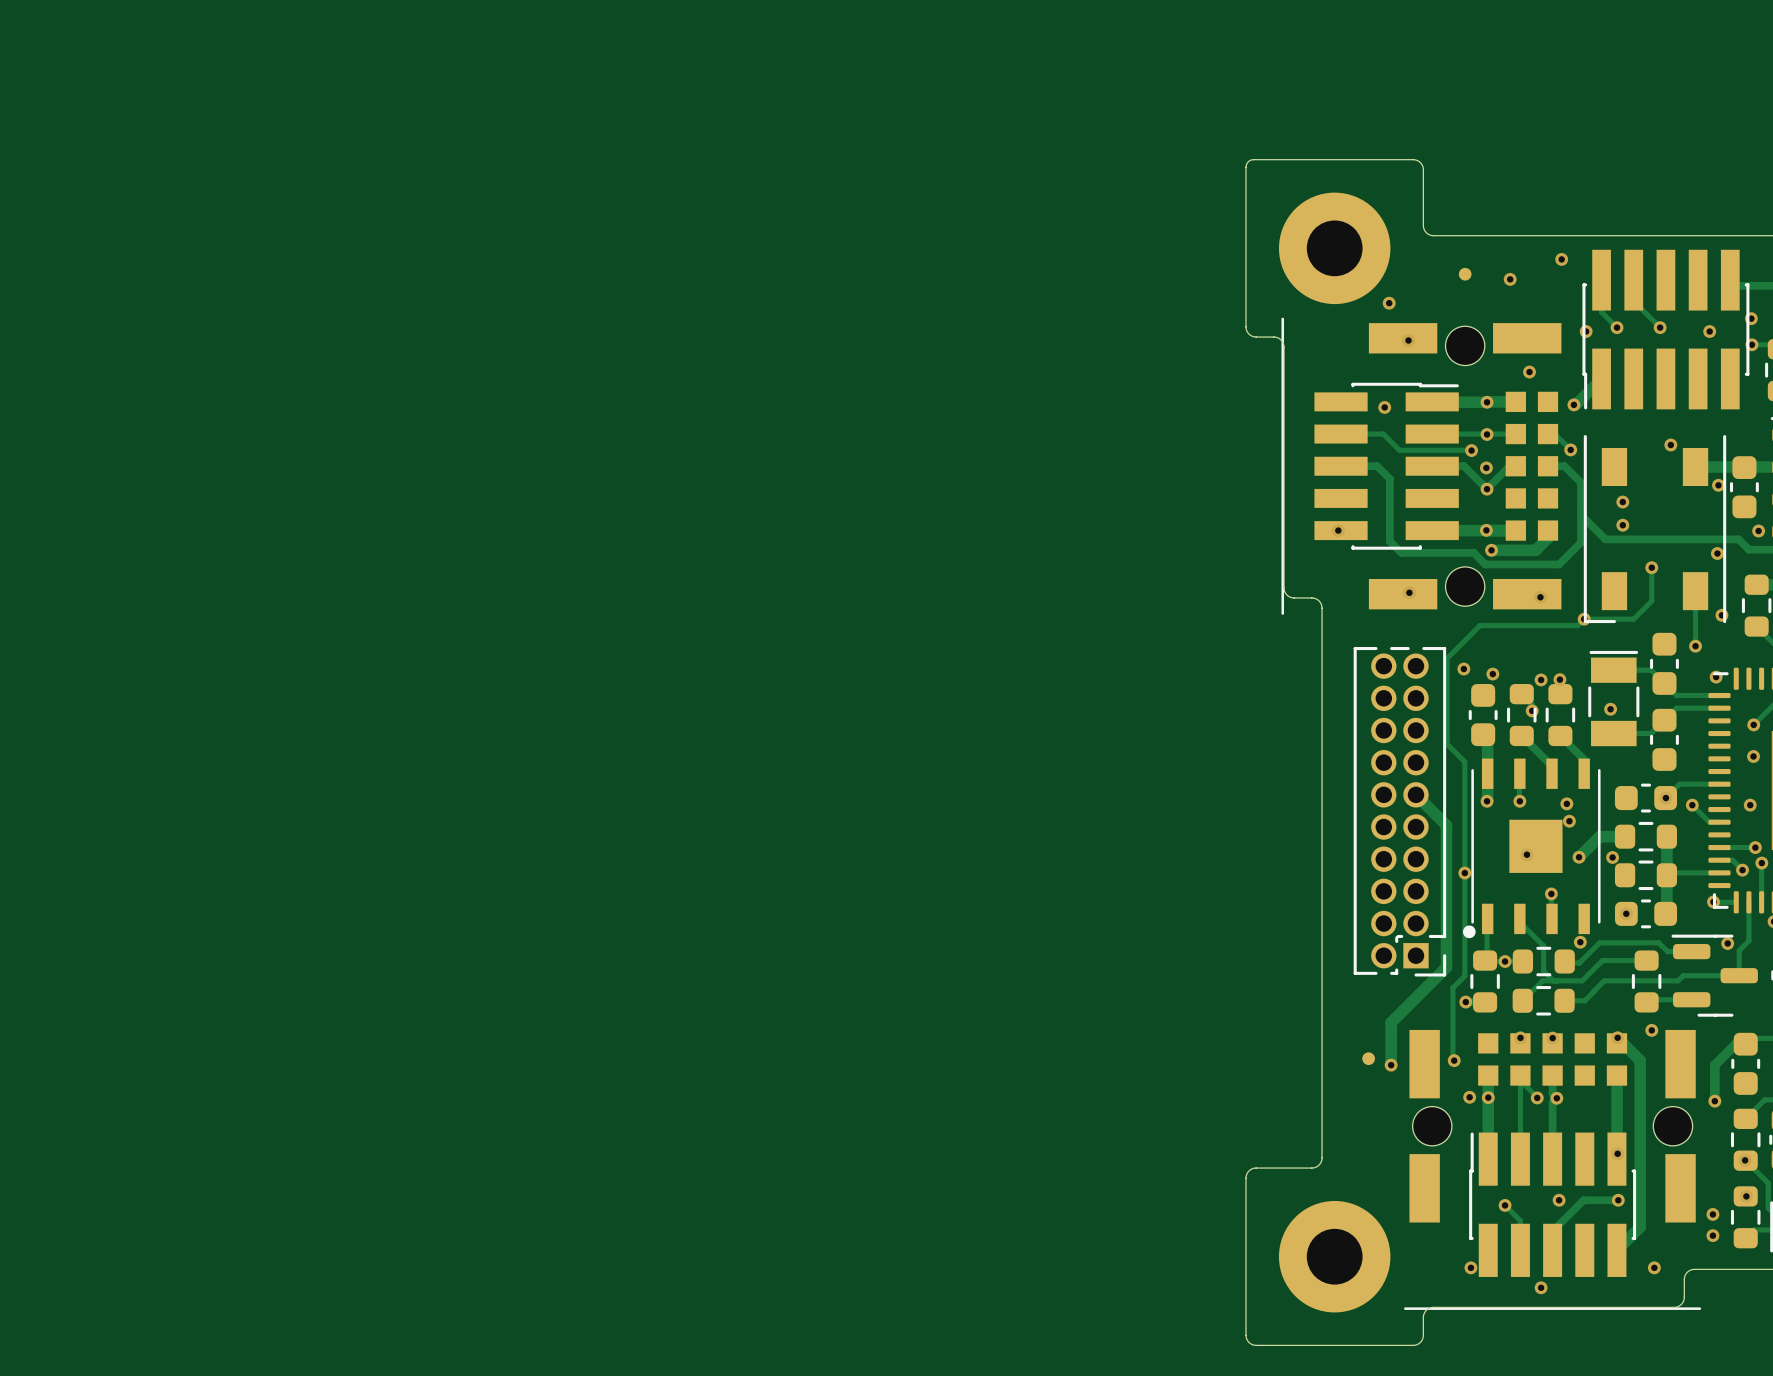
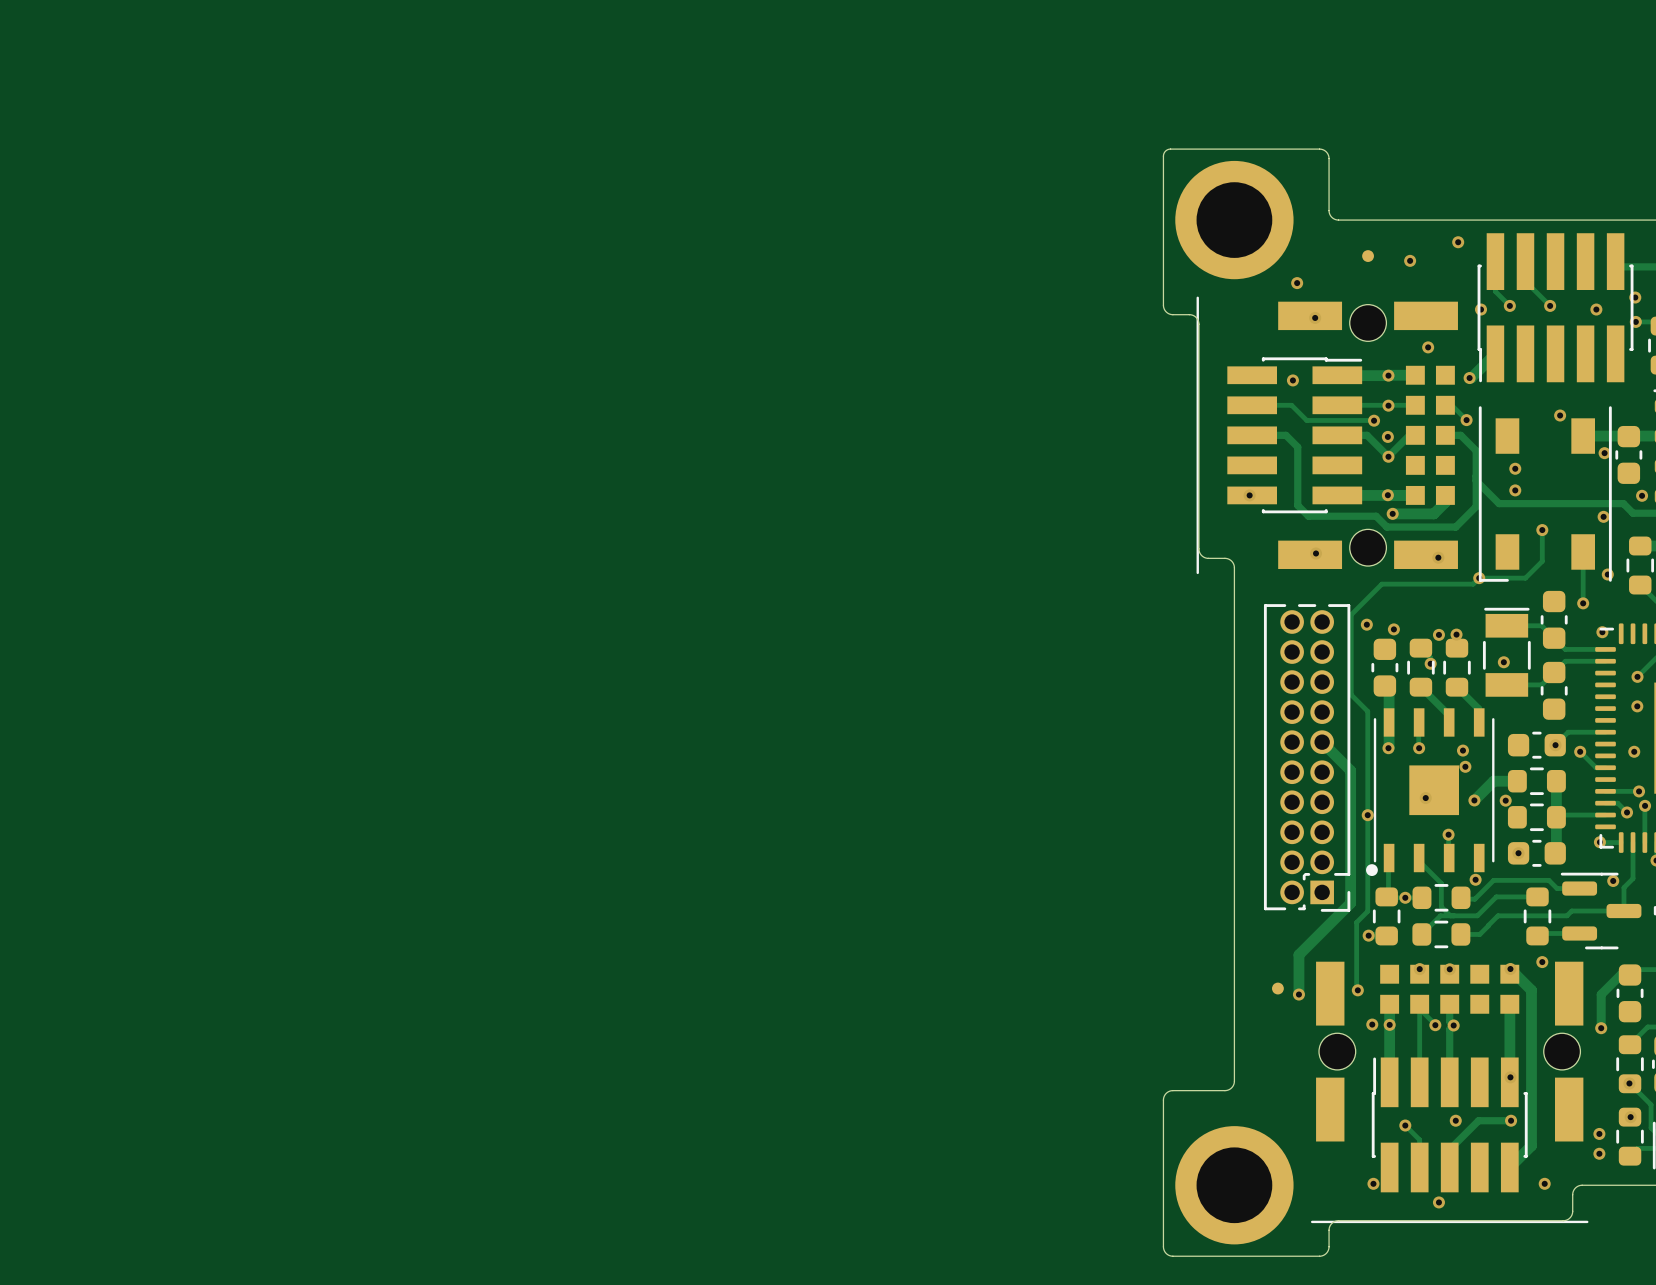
part footprint: [1278, 192, 1391, 305] -> [1175, 160, 1294, 280]
part footprint: [1278, 1200, 1391, 1313] -> [1175, 1126, 1294, 1245]

